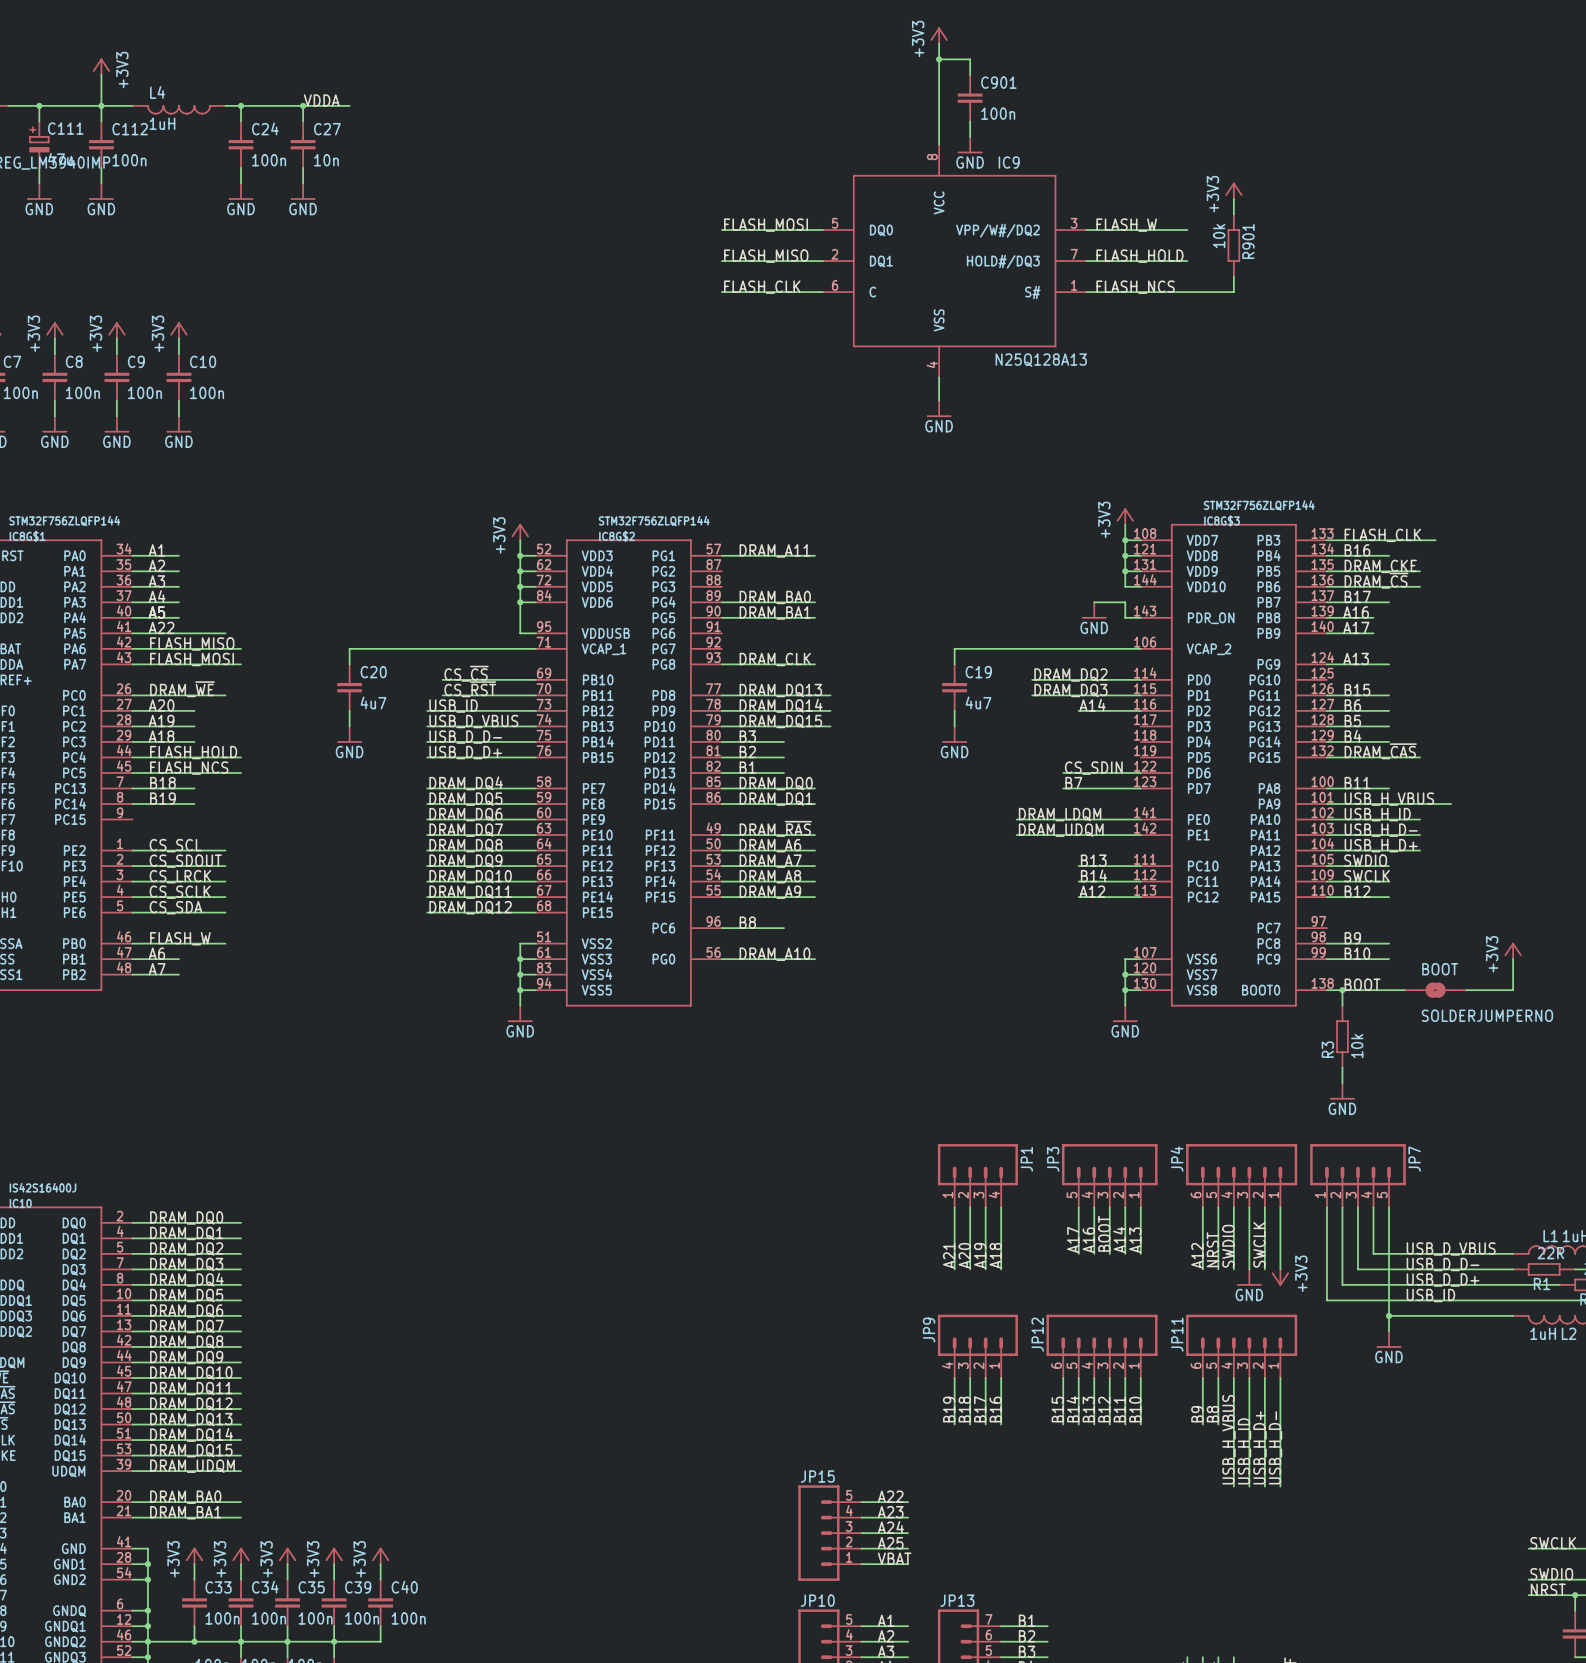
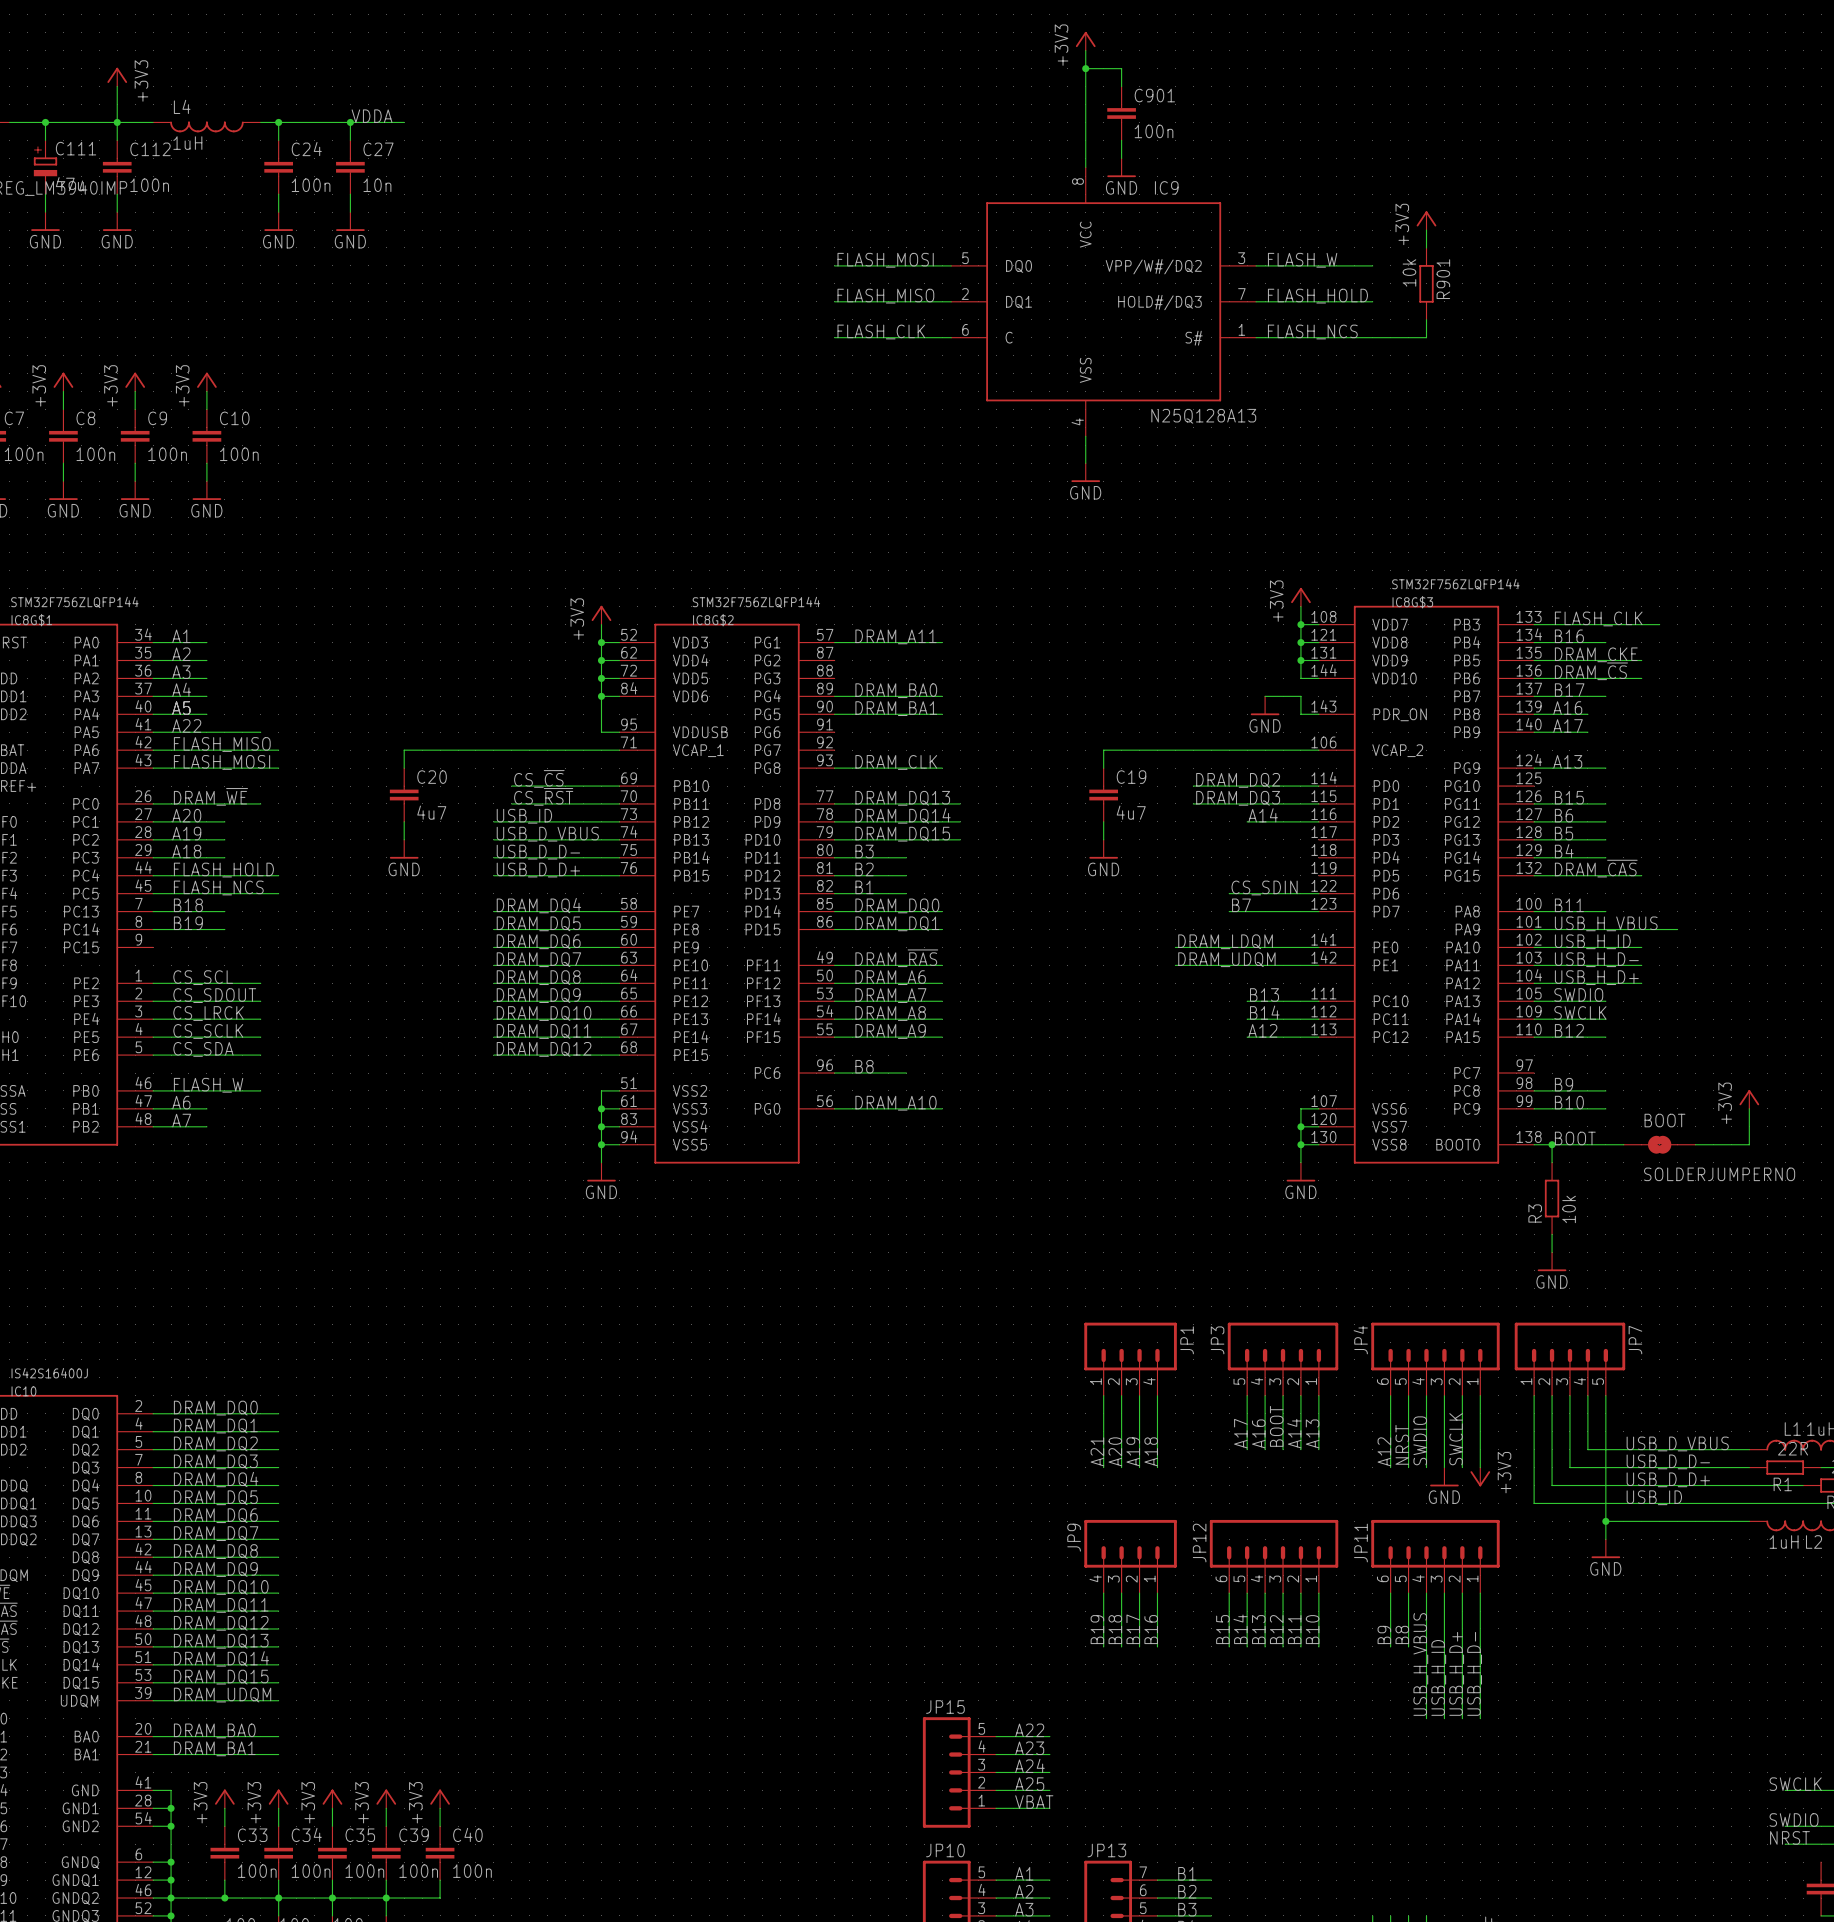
wire: (1528, 1548) (1544, 1548) -> none
wire: (1528, 1579) (1544, 1579) -> none
wire: (1528, 1595) (1544, 1595) -> none
wire: (1575, 1595) (1575, 1610) -> none
junction: (1575, 1595) -> none

